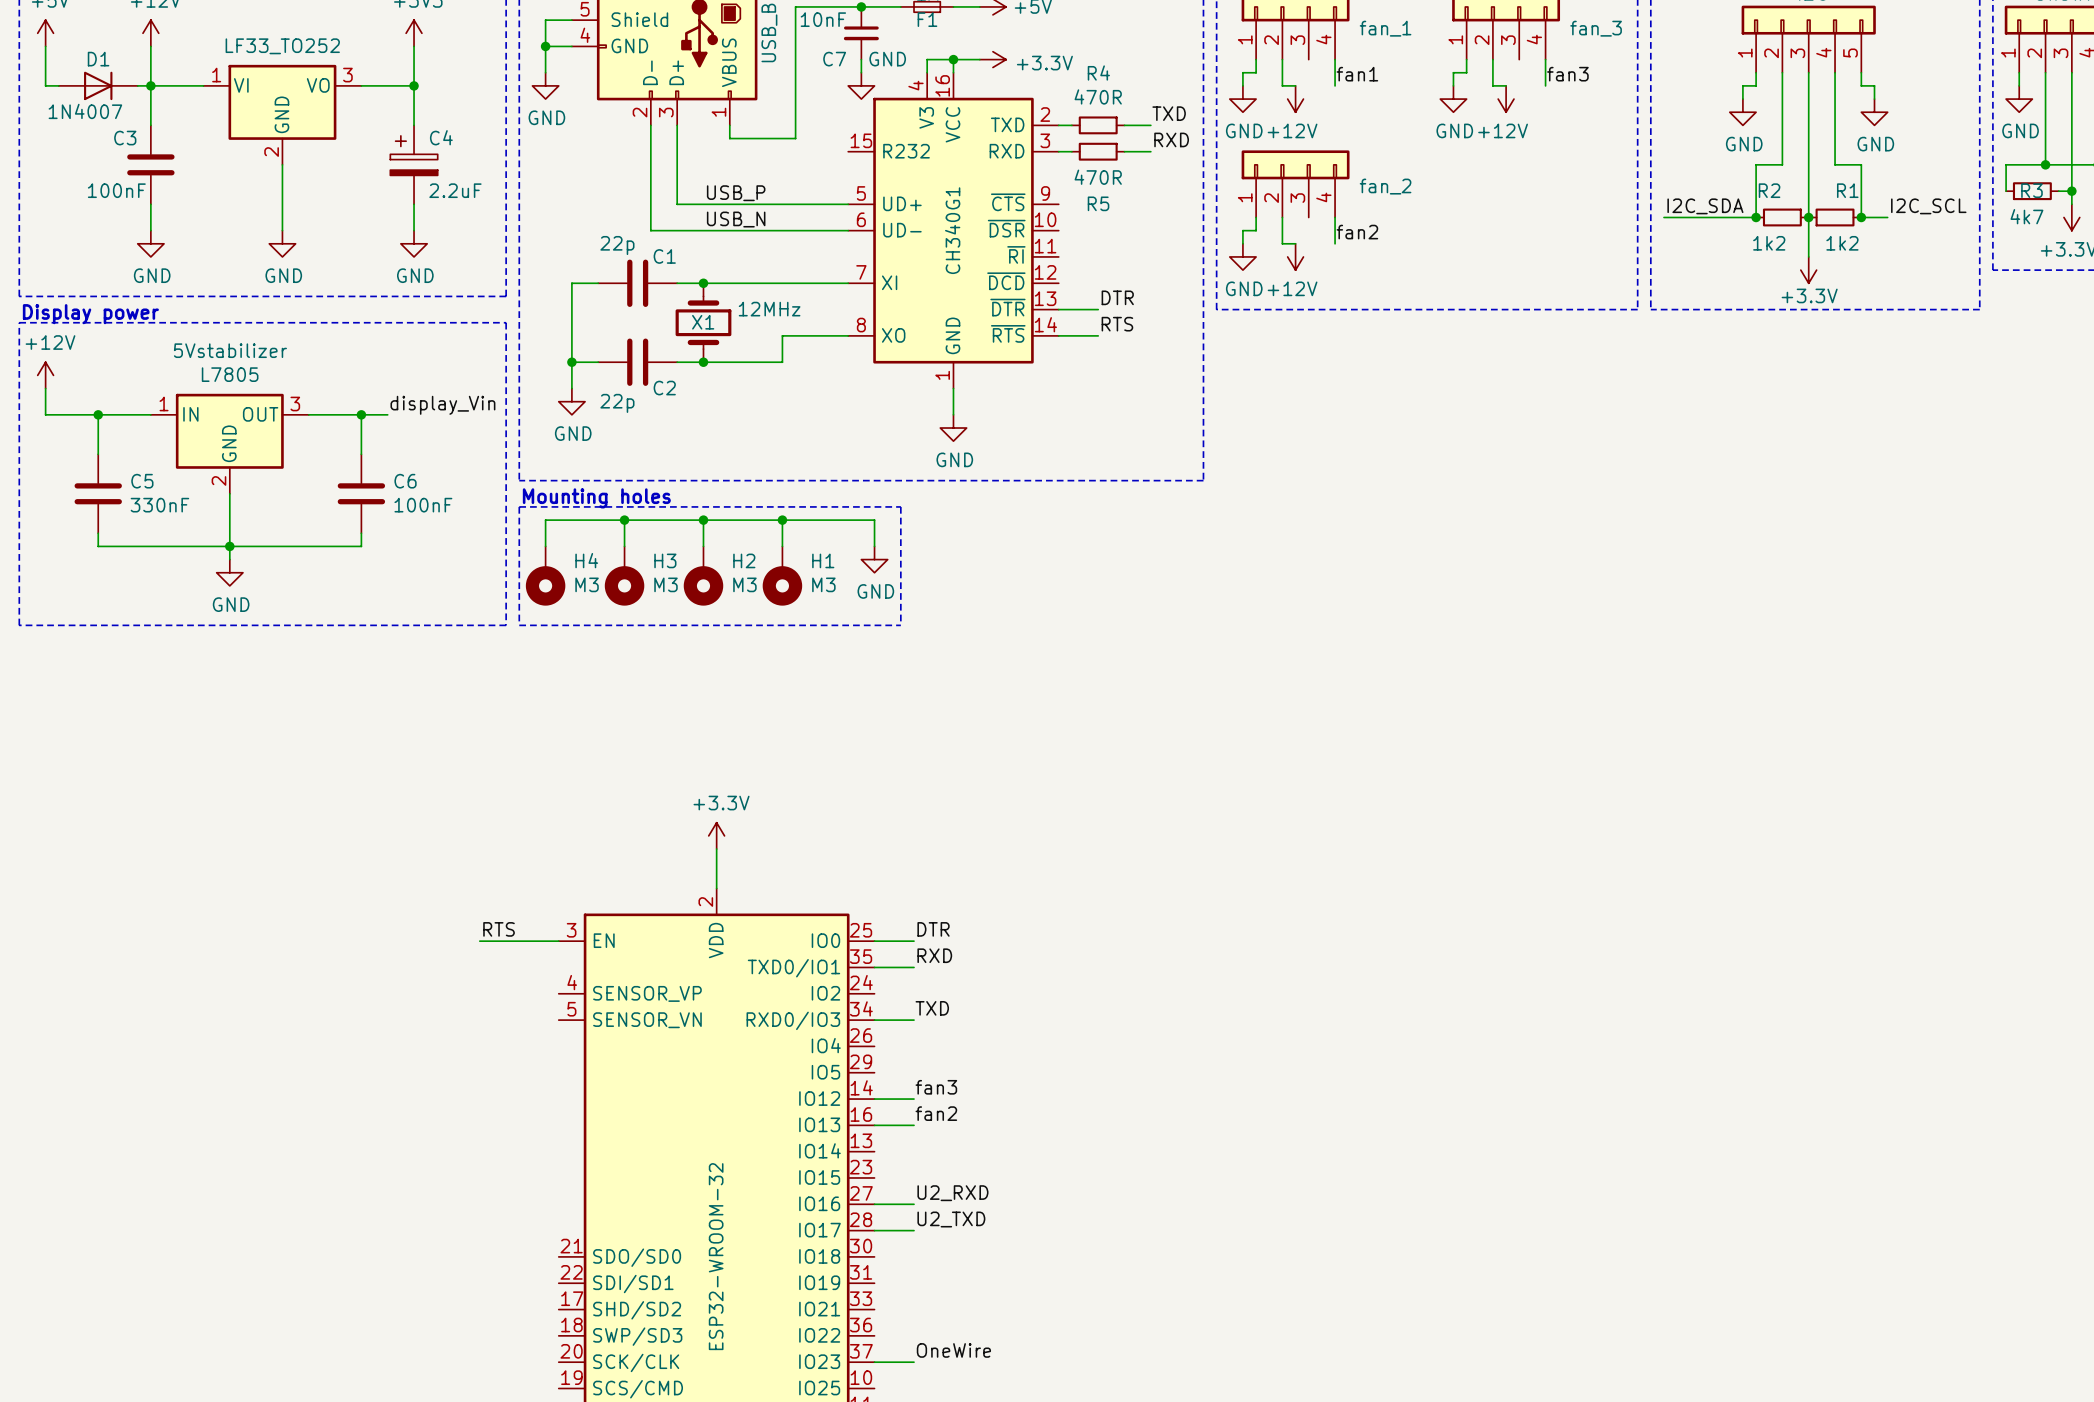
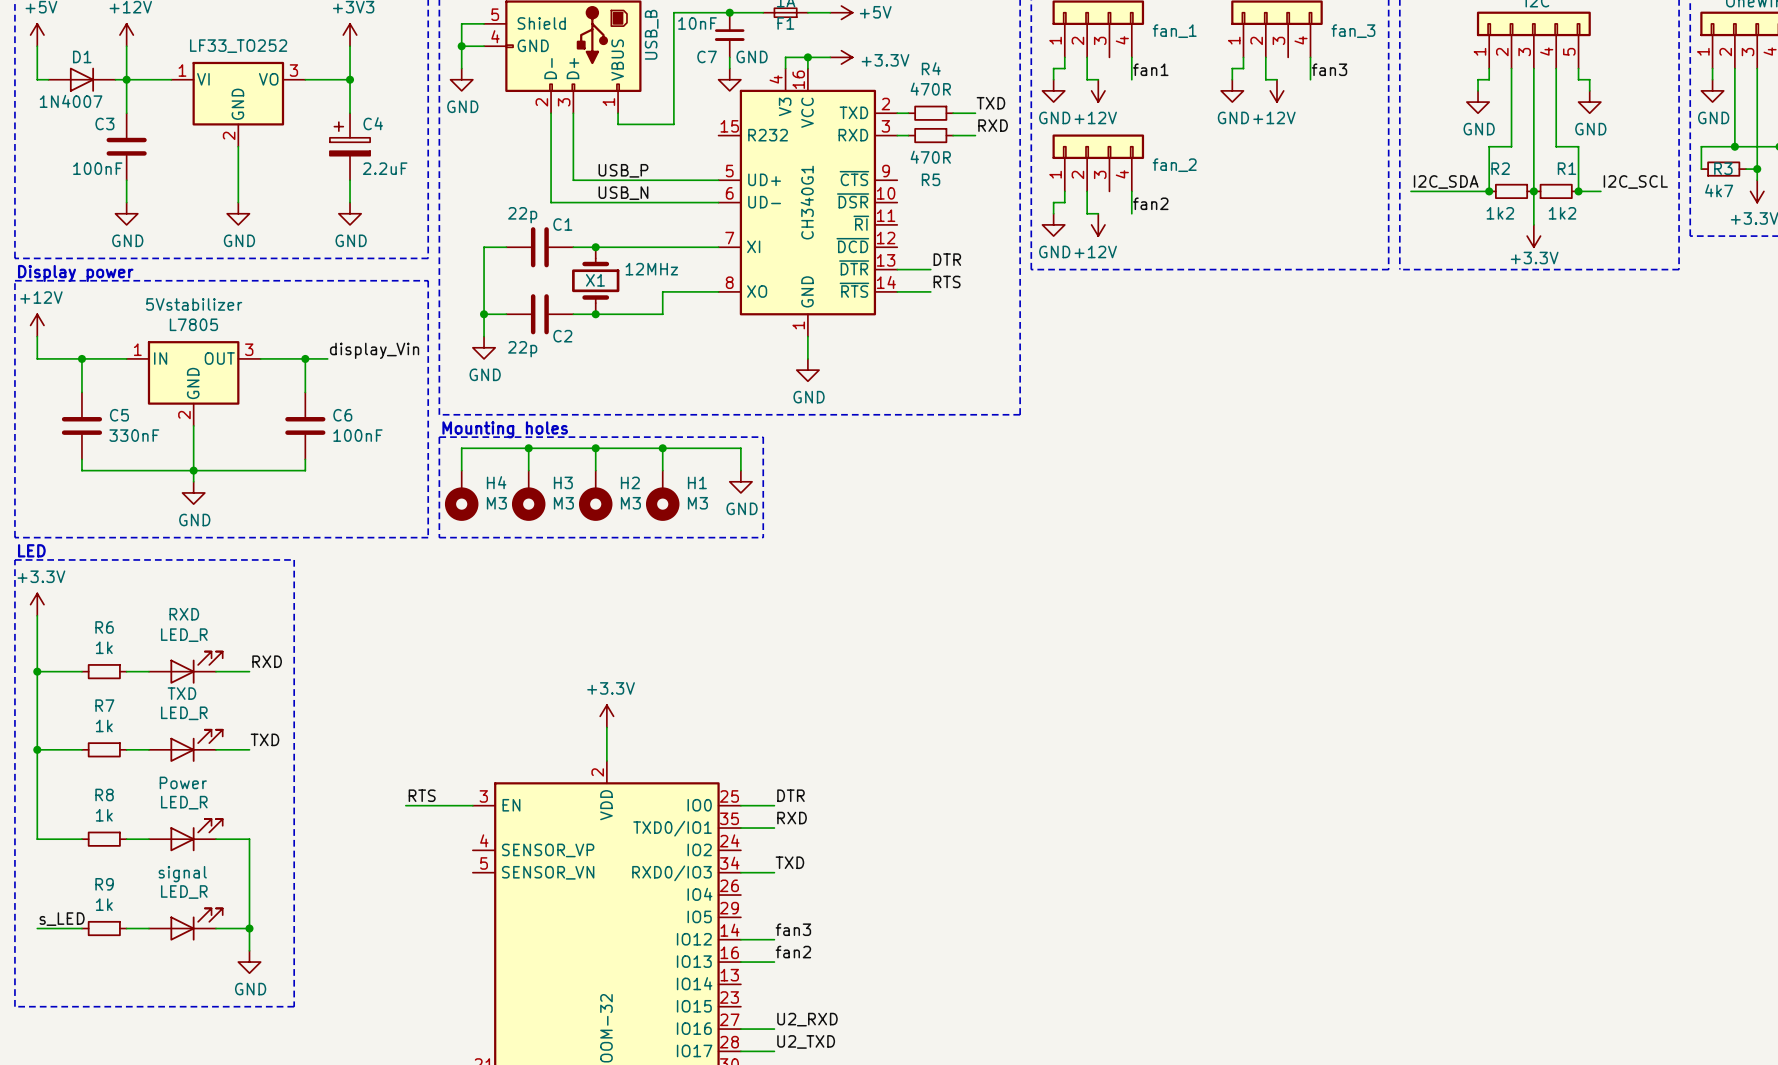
text: none -> LED (31, 550)
line: none -> (14, 559) (294, 559) (294, 1006) (14, 1006) (14, 559)
power symbol: none -> +3.3V (37, 604)
wire: none -> (37, 615) (37, 839) (81, 839)
label: none -> RXD (267, 661)
RXD: none -> LED_R (185, 667)
wire: none -> (37, 671) (81, 671)
junction: none -> (37, 671)
R6: none -> 1k (104, 671)
wire: none -> (126, 671) (148, 671)
wire: none -> (215, 671) (249, 671)
label: none -> TXD (265, 739)
TXD: none -> LED_R (185, 745)
wire: none -> (37, 749) (81, 749)
junction: none -> (37, 749)
R7: none -> 1k (104, 749)
wire: none -> (126, 749) (148, 749)
wire: none -> (215, 749) (249, 749)
Power: none -> LED_R (185, 835)
R8: none -> 1k (104, 839)
wire: none -> (126, 839) (148, 839)
wire: none -> (215, 839) (249, 839) (249, 950)
label: none -> s_LED (62, 919)
signal: none -> LED_R (185, 924)
wire: none -> (37, 928) (81, 928)
R9: none -> 1k (104, 928)
wire: none -> (126, 928) (148, 928)
wire: none -> (215, 928) (249, 928)
junction: none -> (249, 928)
power symbol: none -> GND (249, 962)

